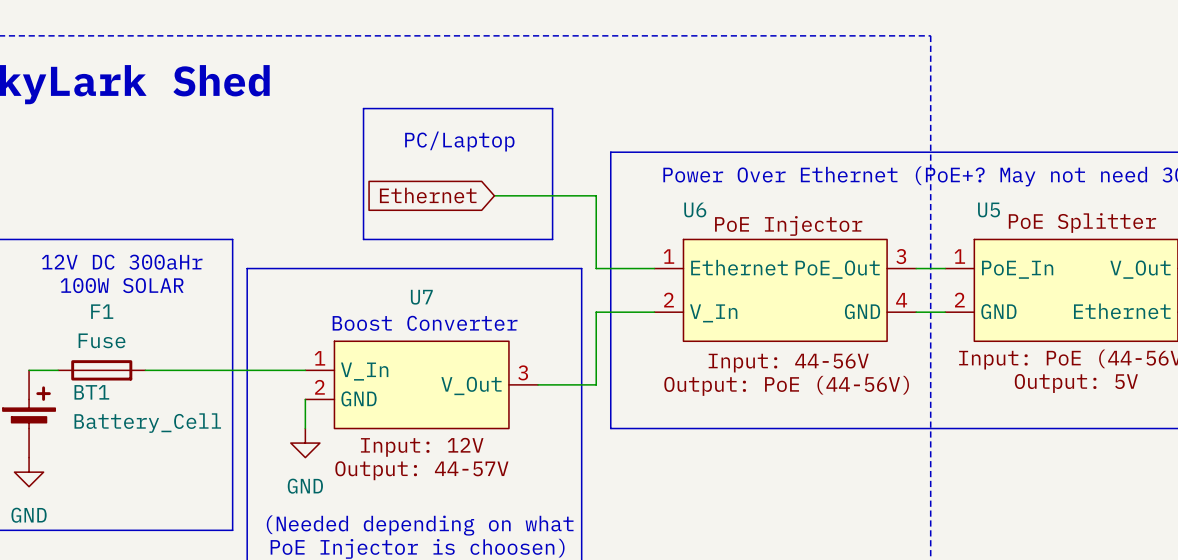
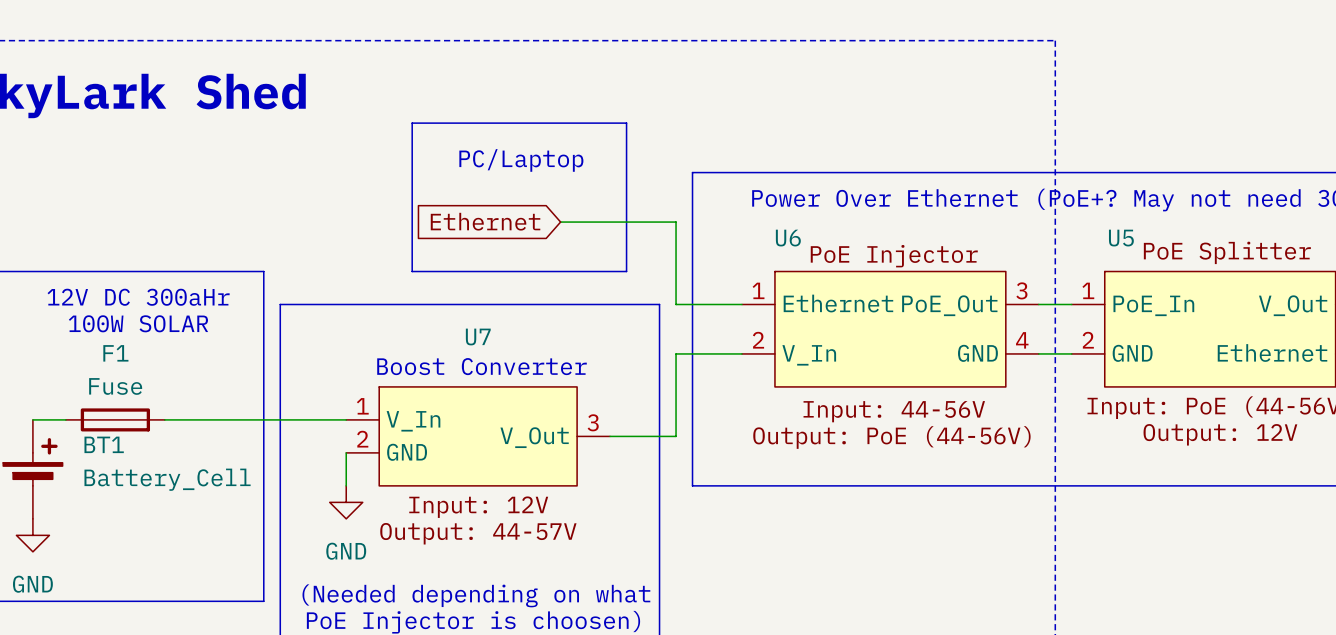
U5 text: Output: 5V (1076, 383) -> Output: 12V (1220, 434)

